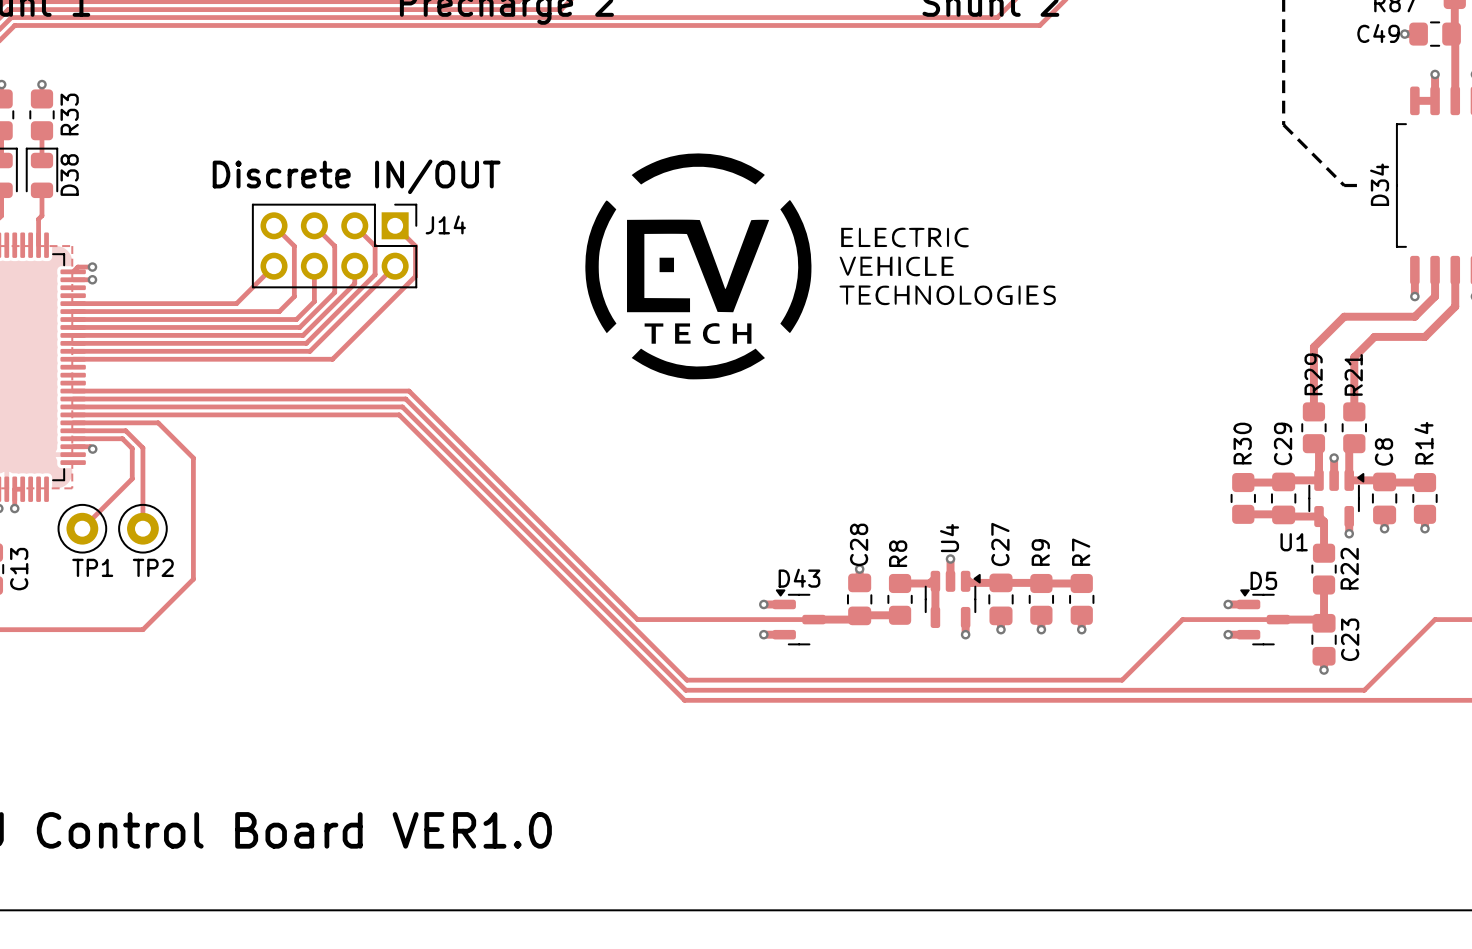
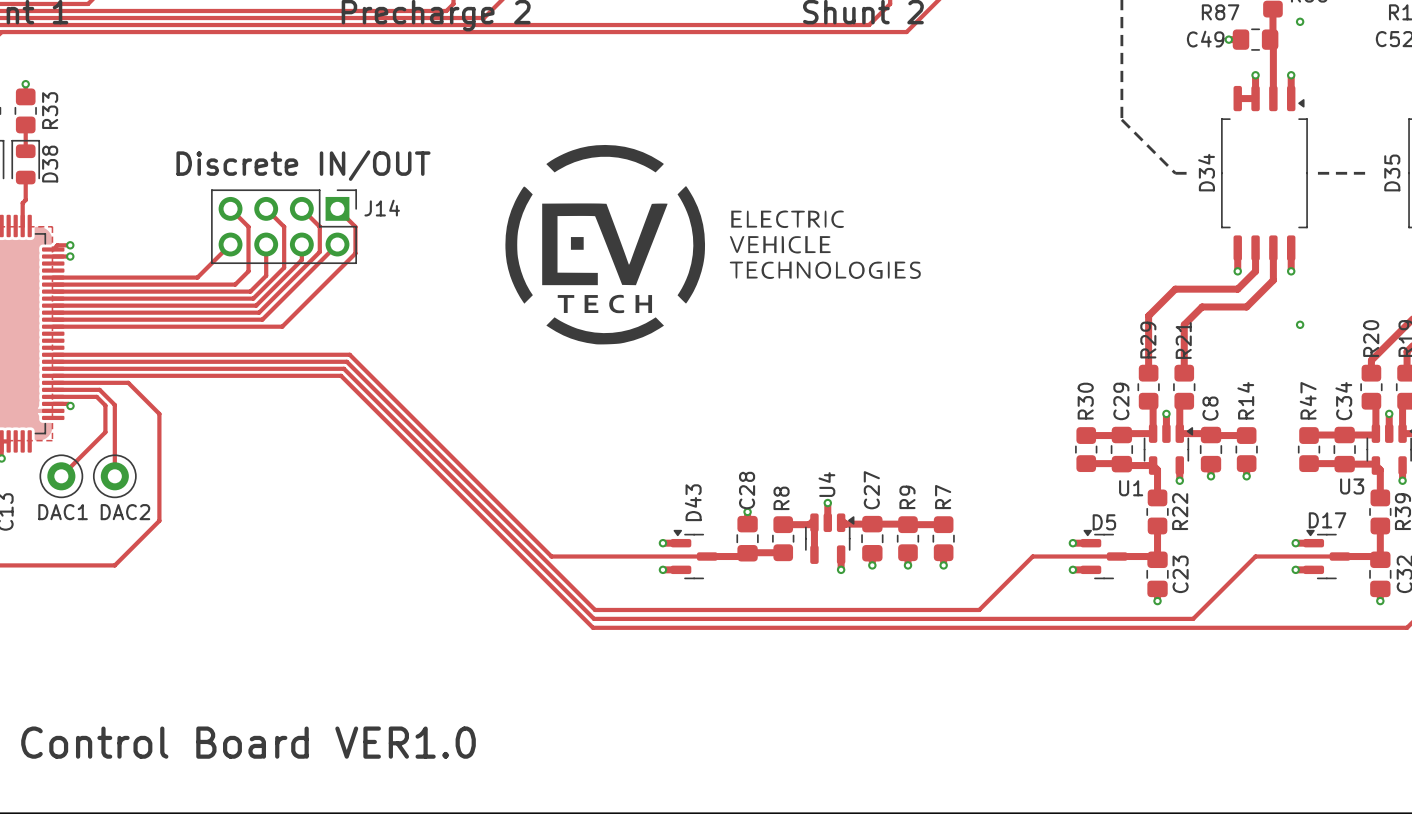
TP1 name: TP1 (92, 567) -> none
TP2 name: TP2 (153, 567) -> none
text: none -> DAC1 (63, 512)
text: none -> DAC2 (125, 512)
D43 name rotation: 0° (799, 578) -> 90° counterclockwise (693, 502)

